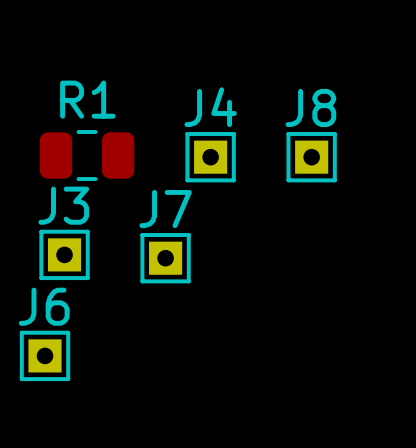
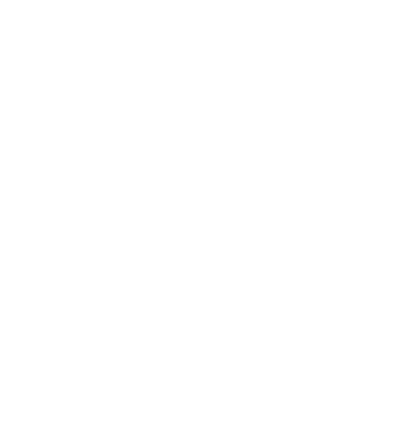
R1: (87, 155) -> none
J4: (210, 157) -> none
J8: (311, 157) -> none
J3: (64, 254) -> none
J7: (165, 258) -> none
J6: (45, 355) -> none

